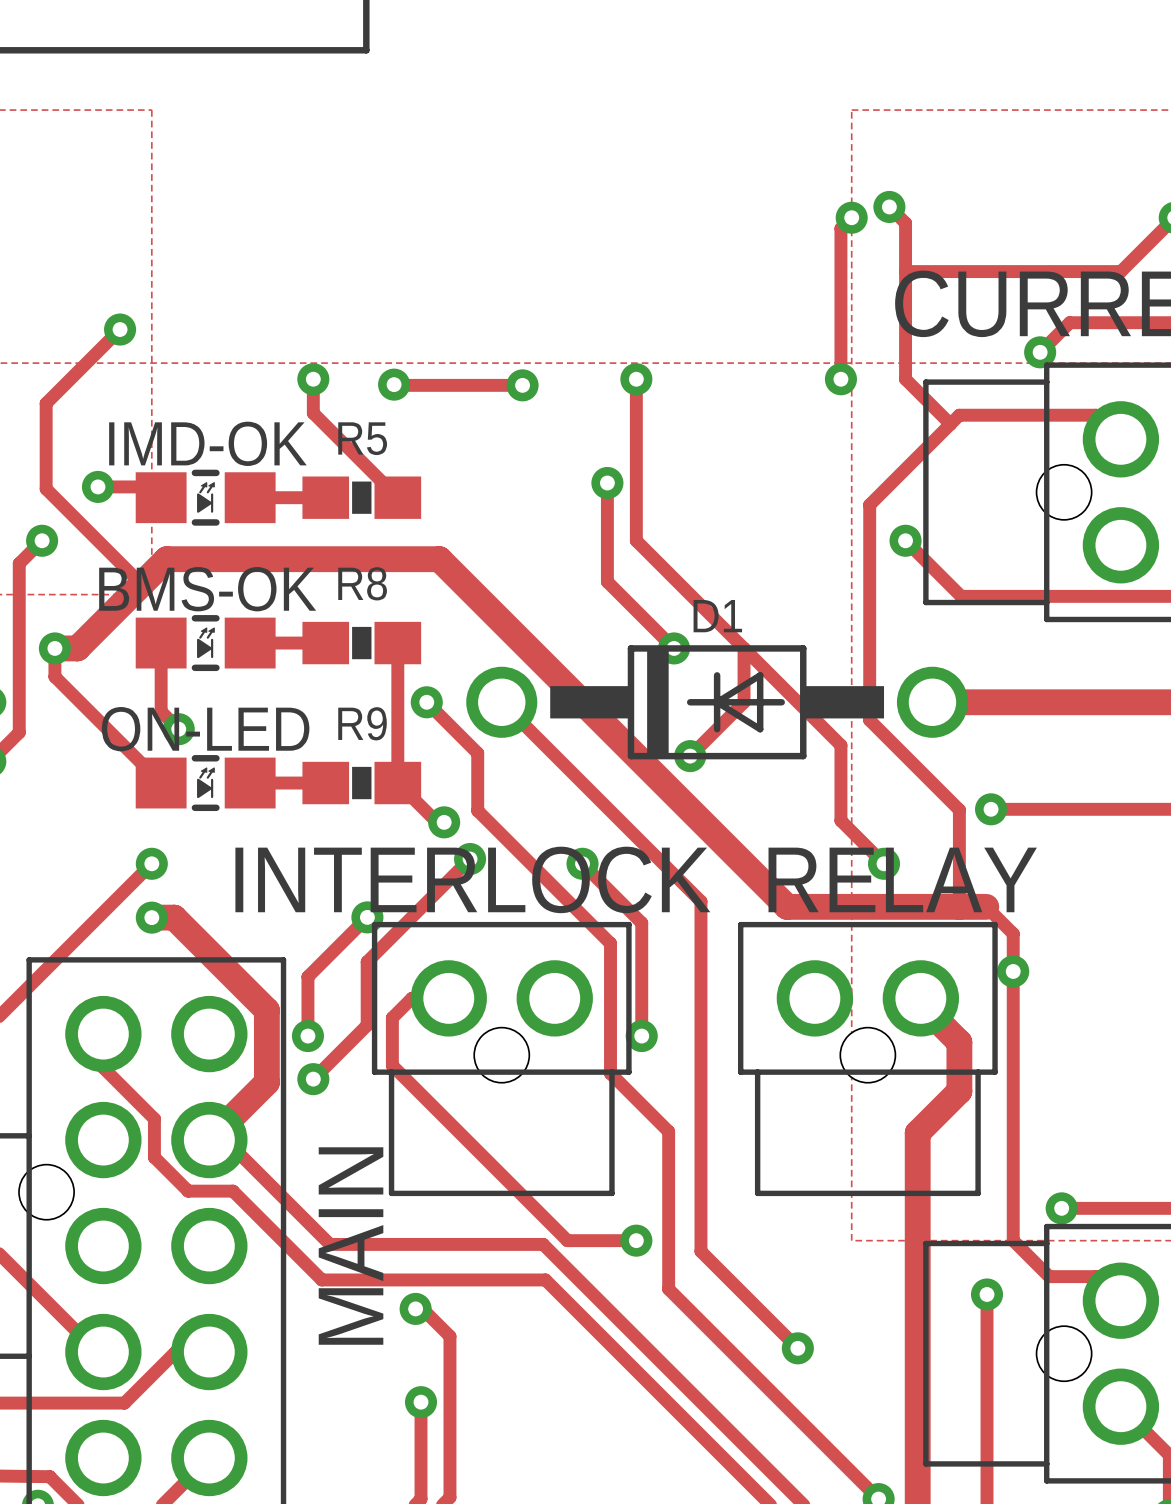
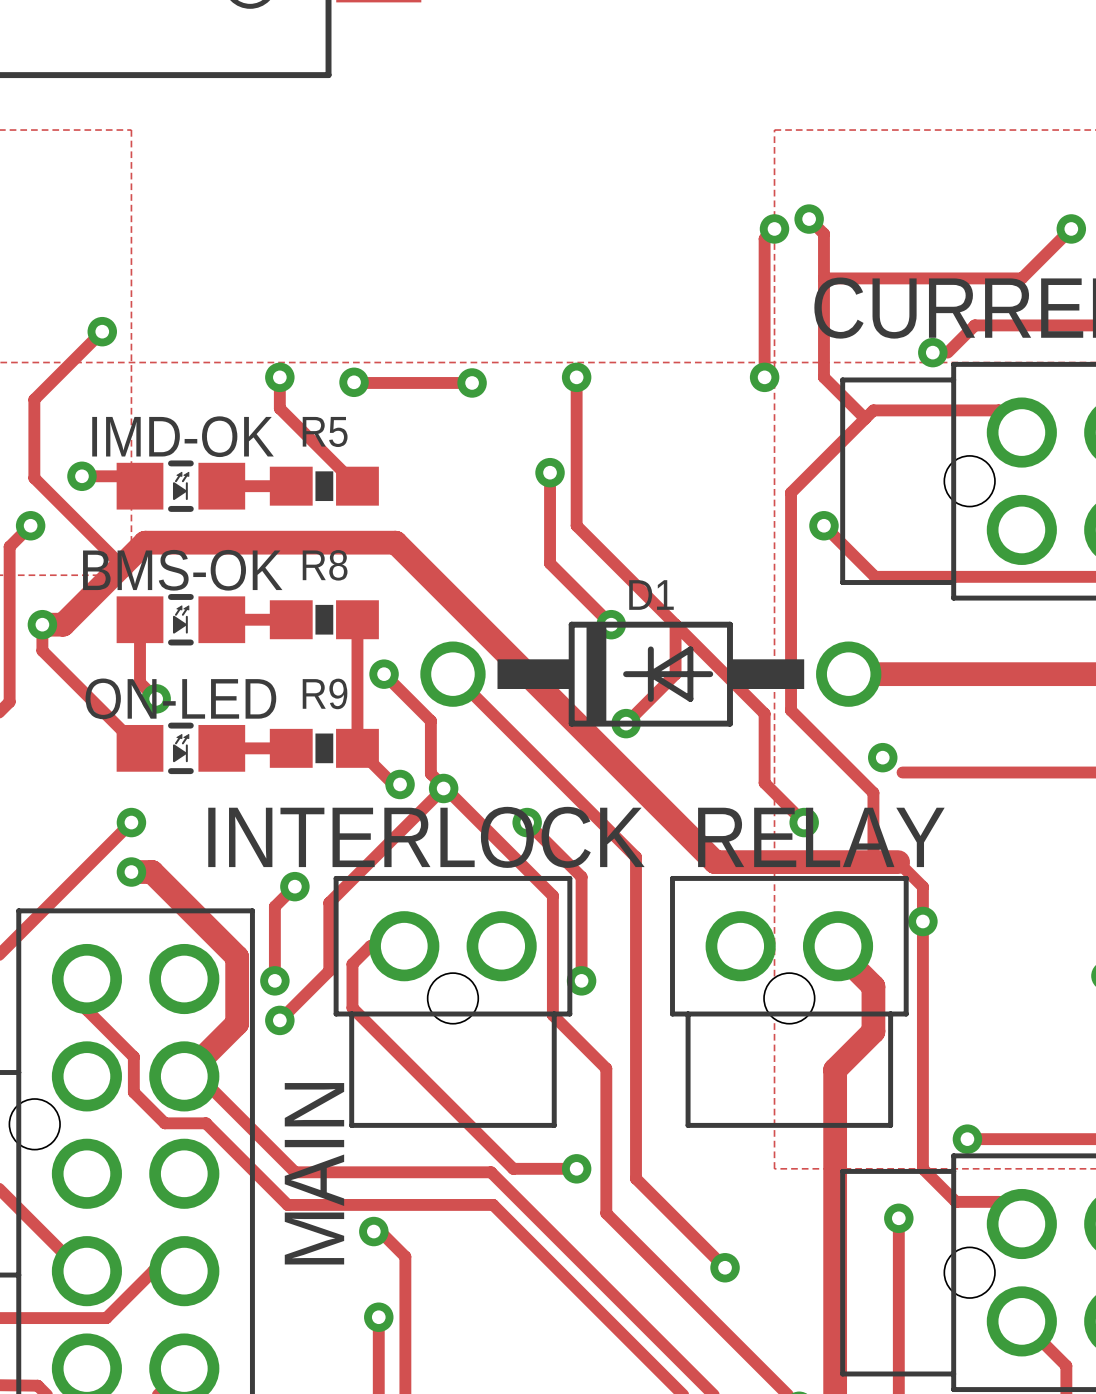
via position: (1040, 352) -> (932, 352)
track: (869, 720) (959, 809) (959, 831) -> (791, 690) (791, 710) (873, 792)
via position: (991, 809) -> (882, 757)
track: (470, 859) (367, 961) -> (443, 788) (329, 902) (329, 912)
via position: (470, 859) -> (443, 788)
track: (367, 917) (307, 976) -> (294, 886) (274, 906) (274, 926)
via position: (367, 917) -> (294, 886)

